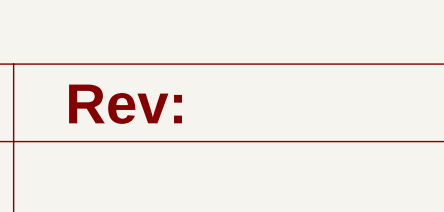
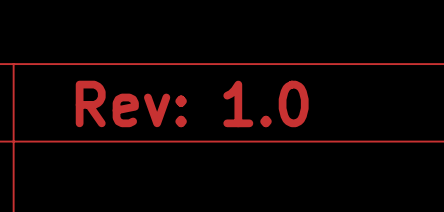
title block: Rev: (125, 104) -> Rev: 1.0 (192, 103)

